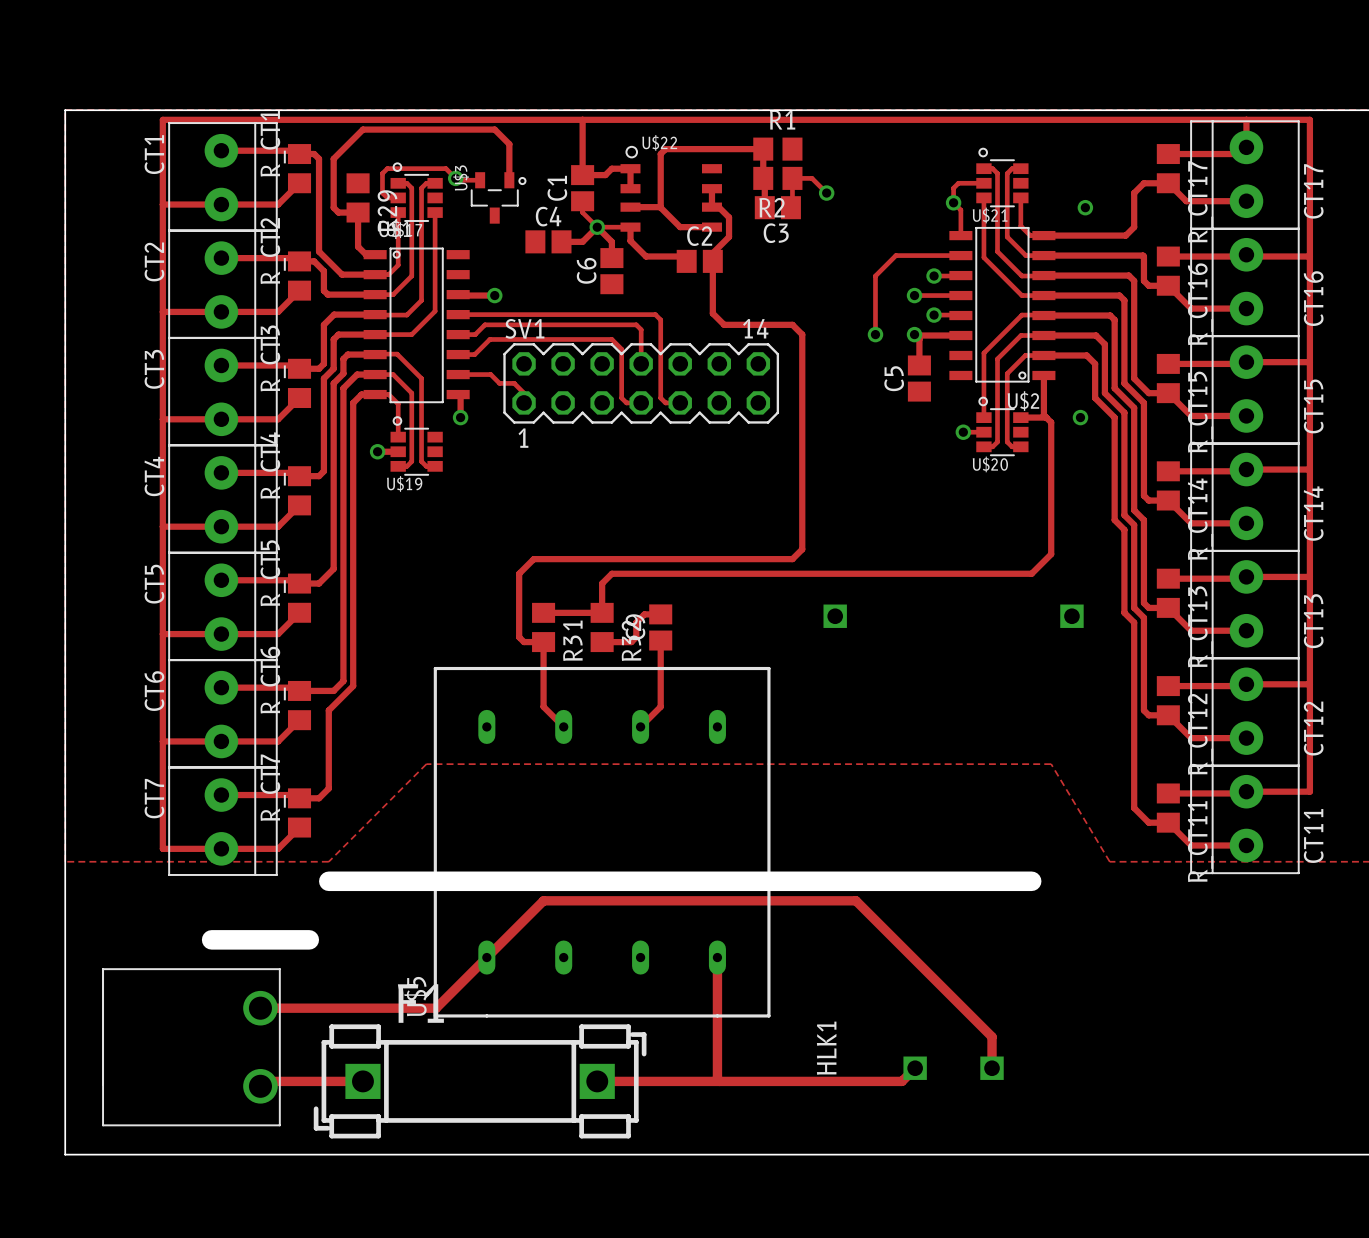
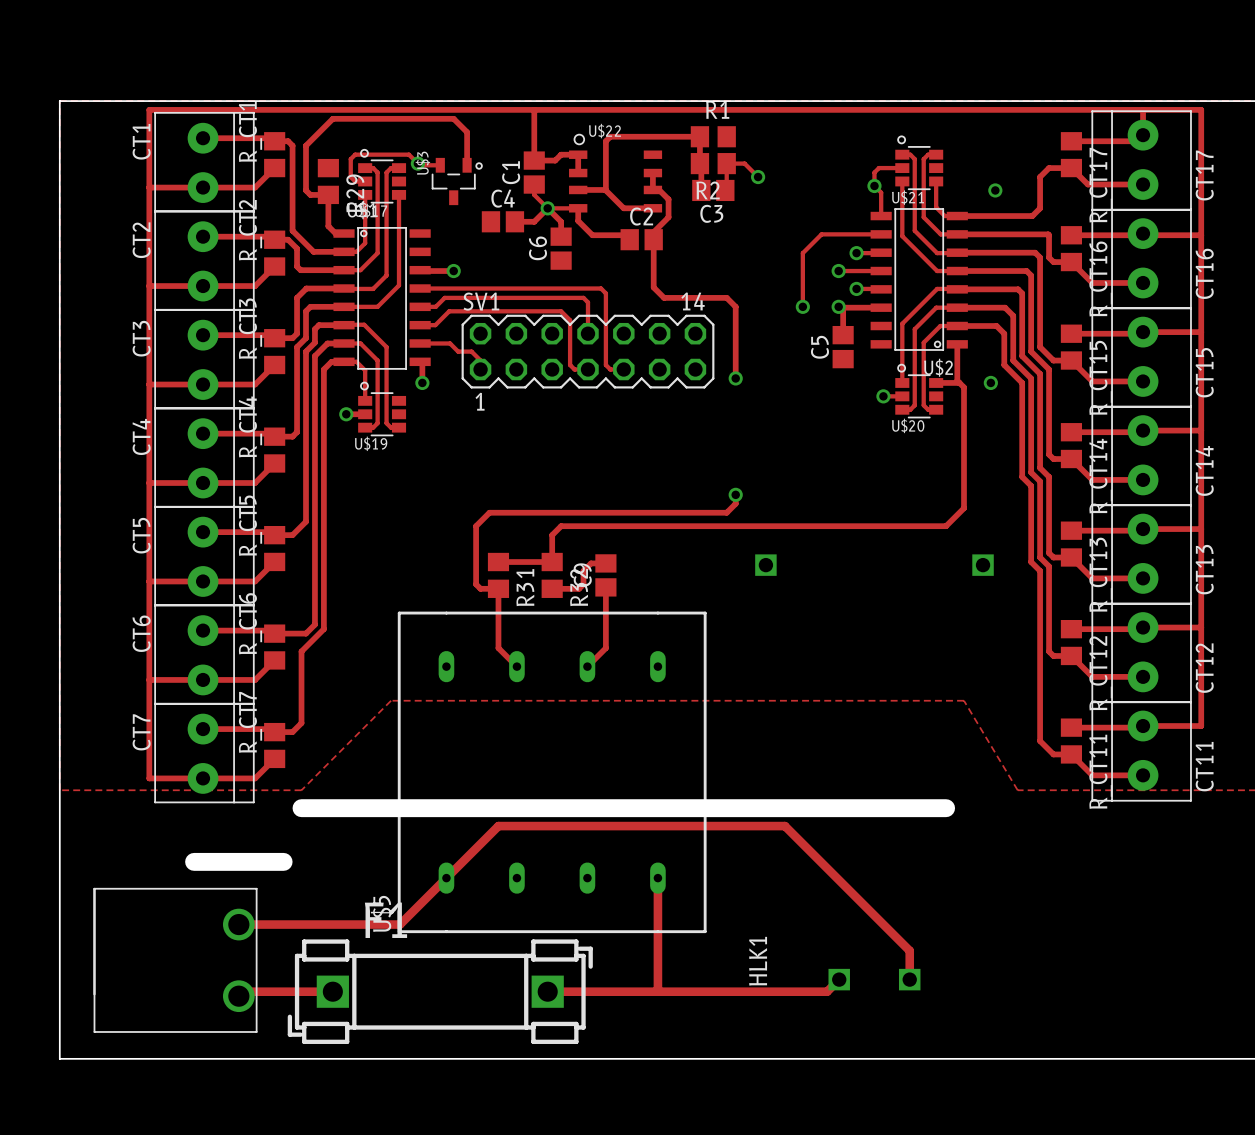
track: (802, 412) (802, 539) -> none
via: none -> (735, 378)
via: none -> (735, 494)

